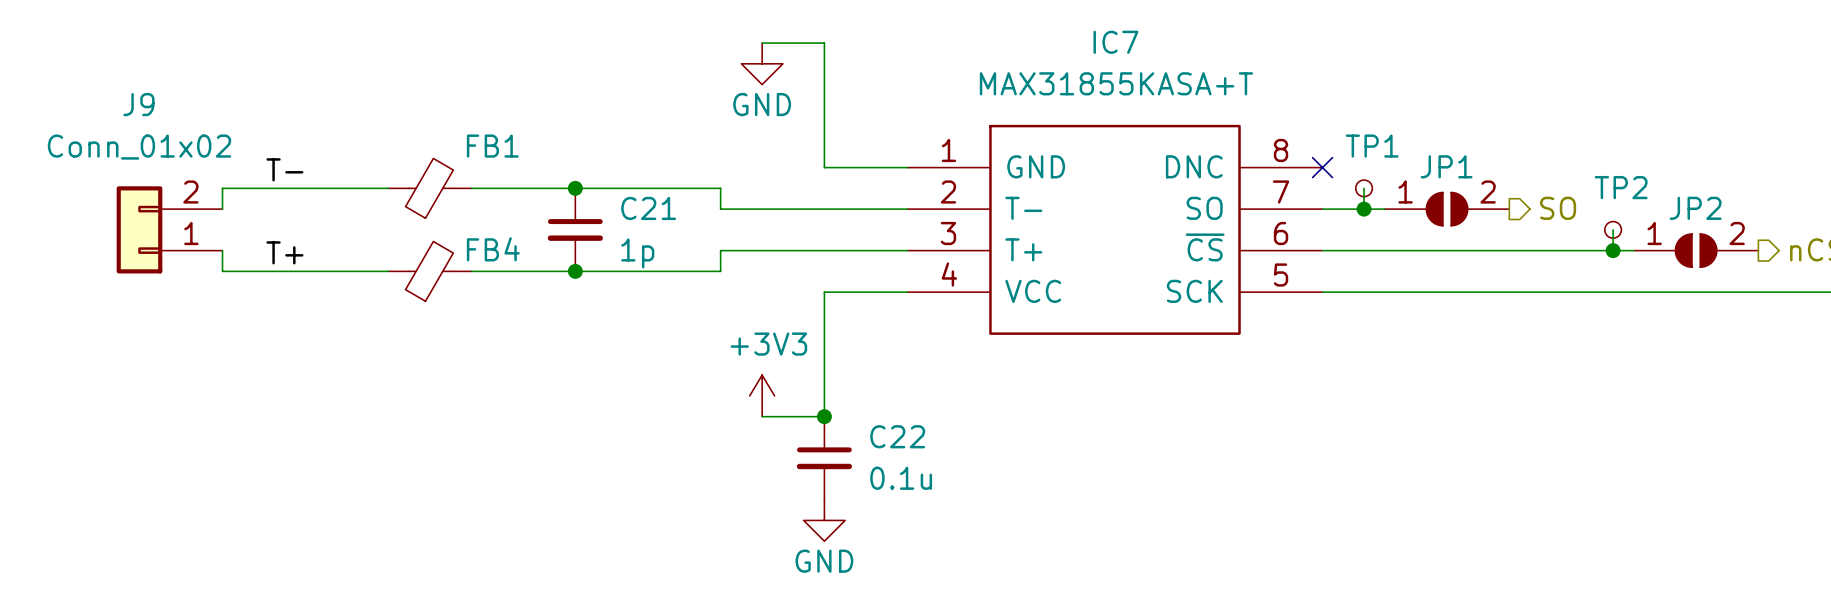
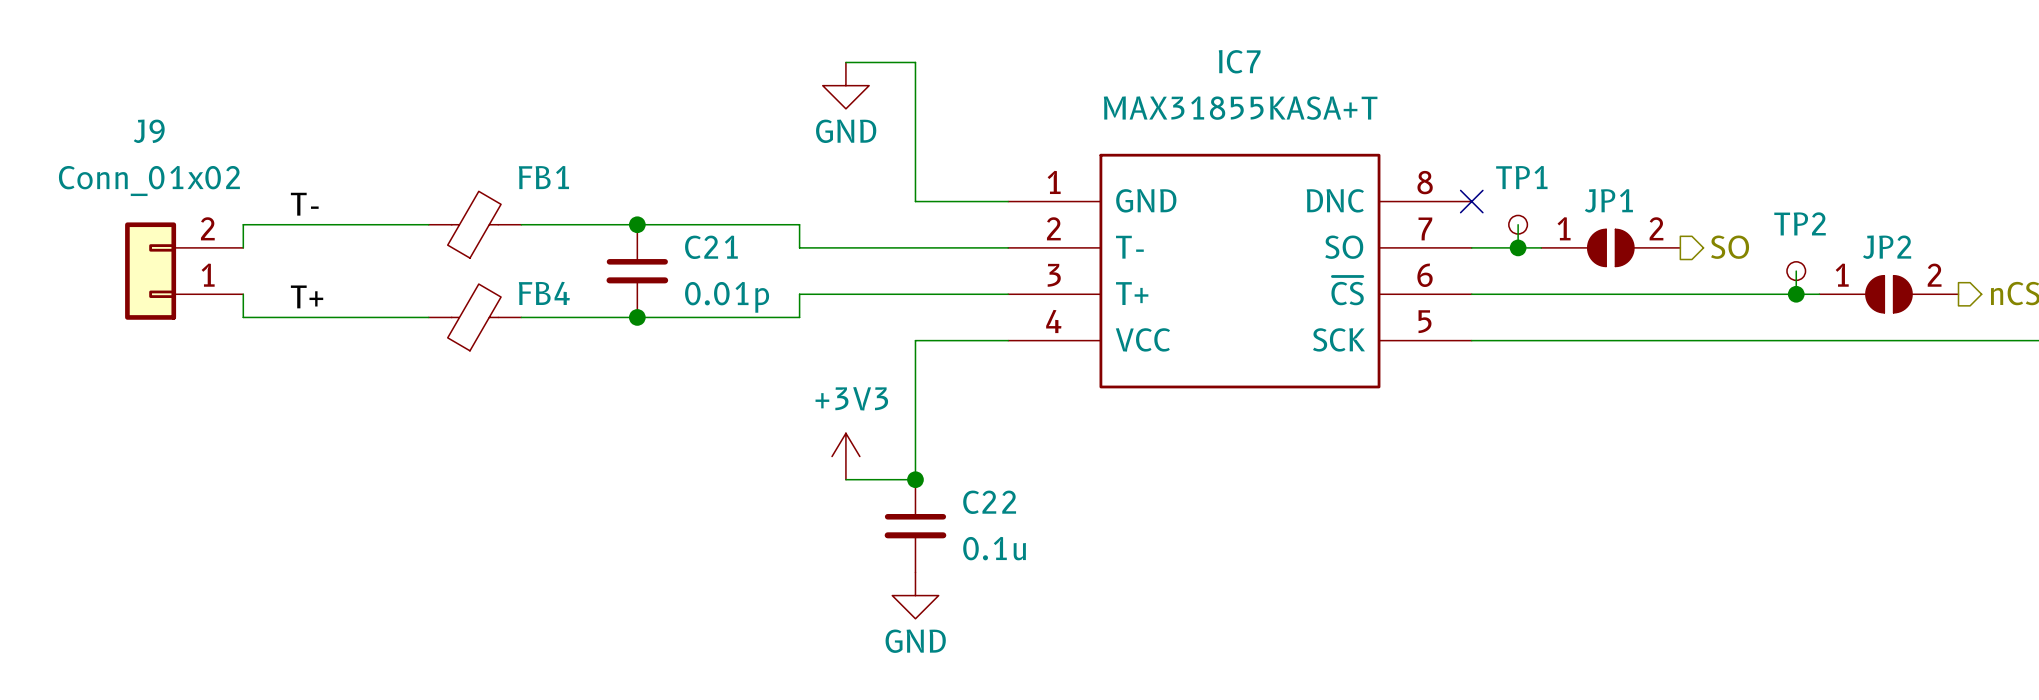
C21 value: 1p (637, 253) -> 0.01p (727, 297)

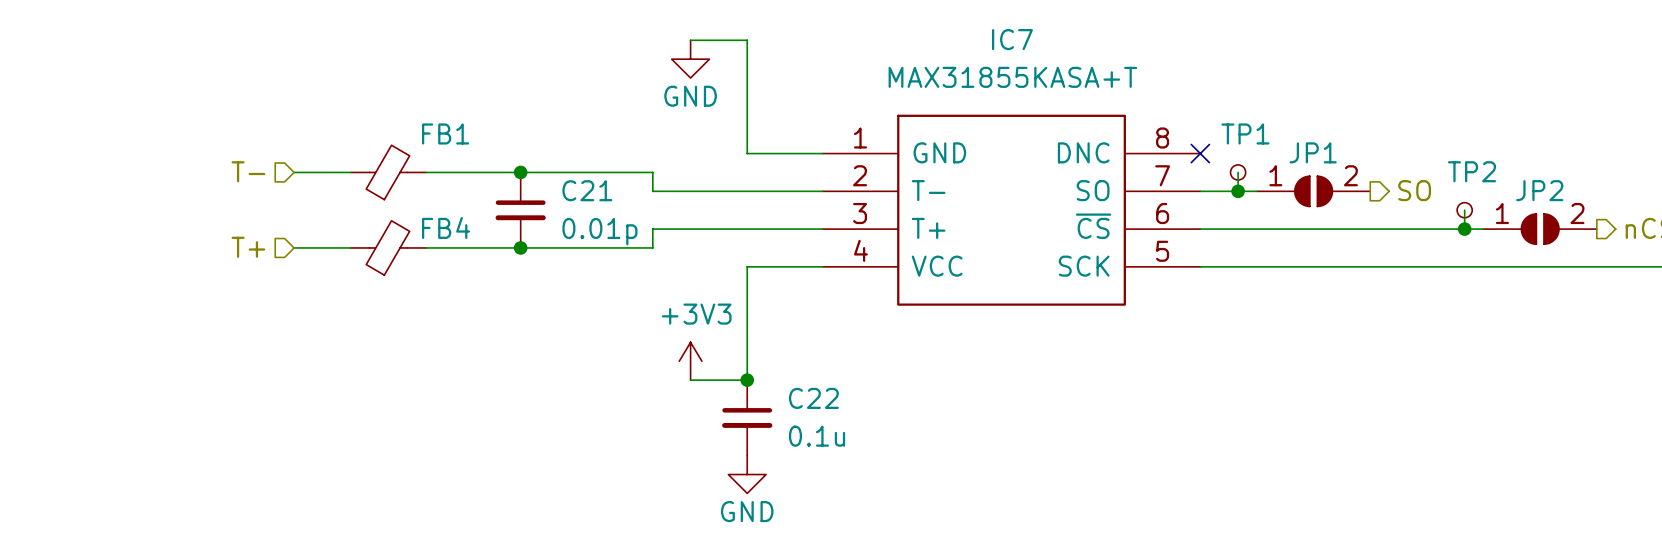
label: T- (304, 204) -> none
hierarchical label: none -> T- (248, 171)
wire: (359, 224) (243, 224) (243, 247) -> none
J9: Conn_01x02 (184, 271) -> none
wire: (243, 294) (243, 317) (359, 317) -> none
label: T+ (307, 296) -> none
hierarchical label: none -> T+ (248, 247)

